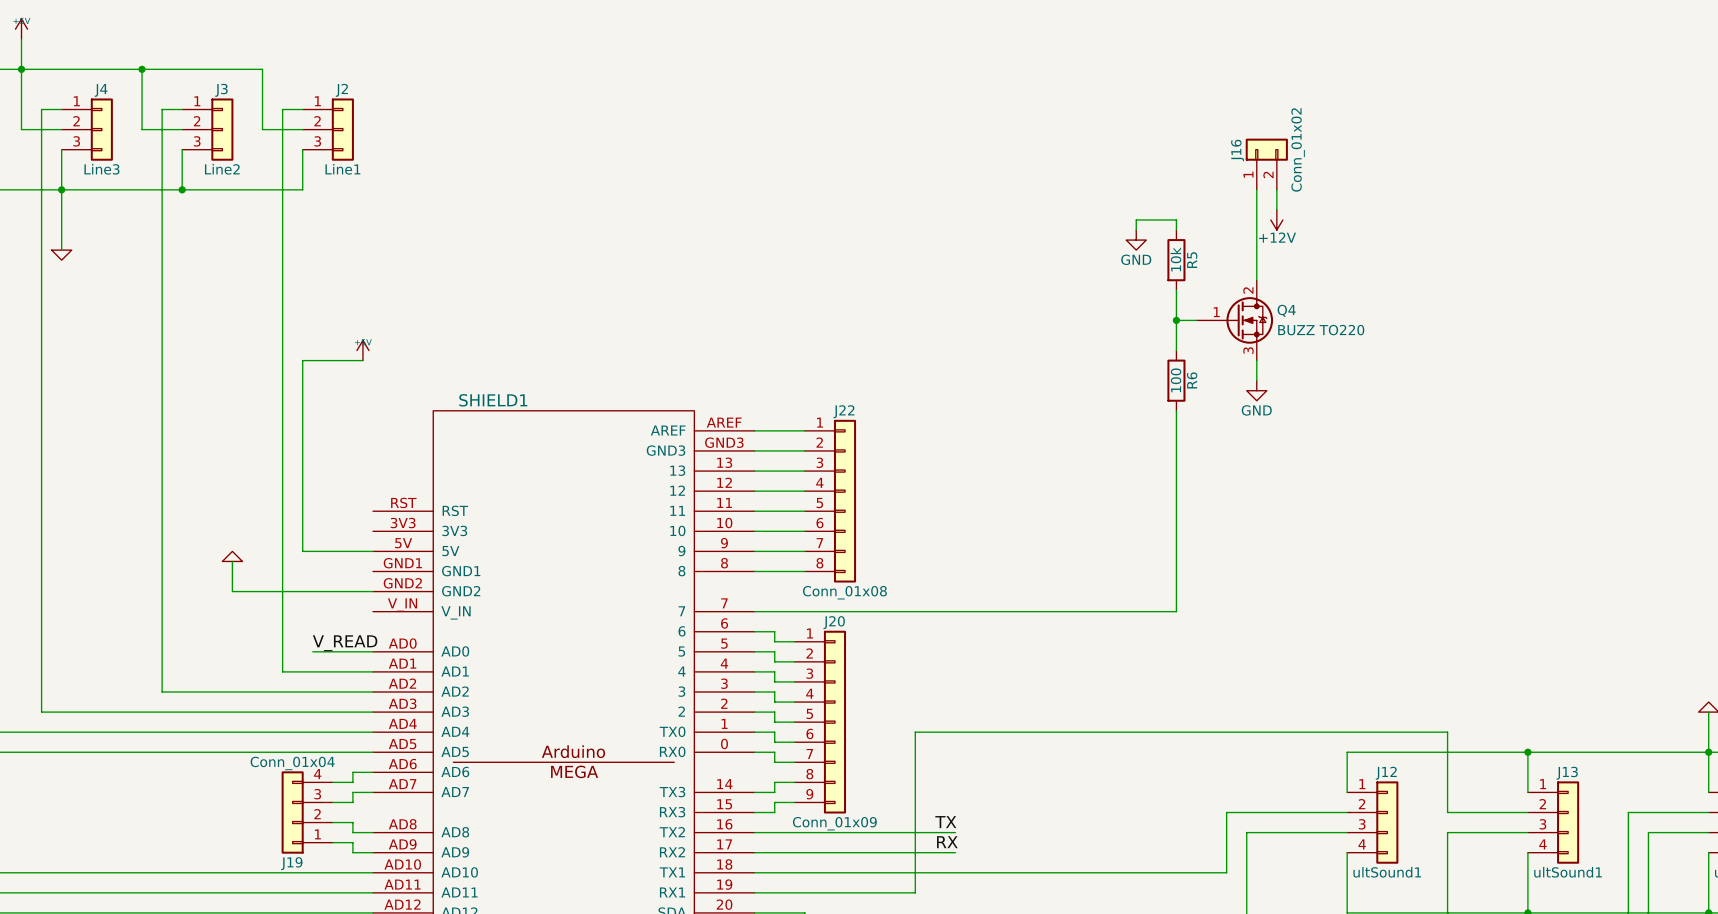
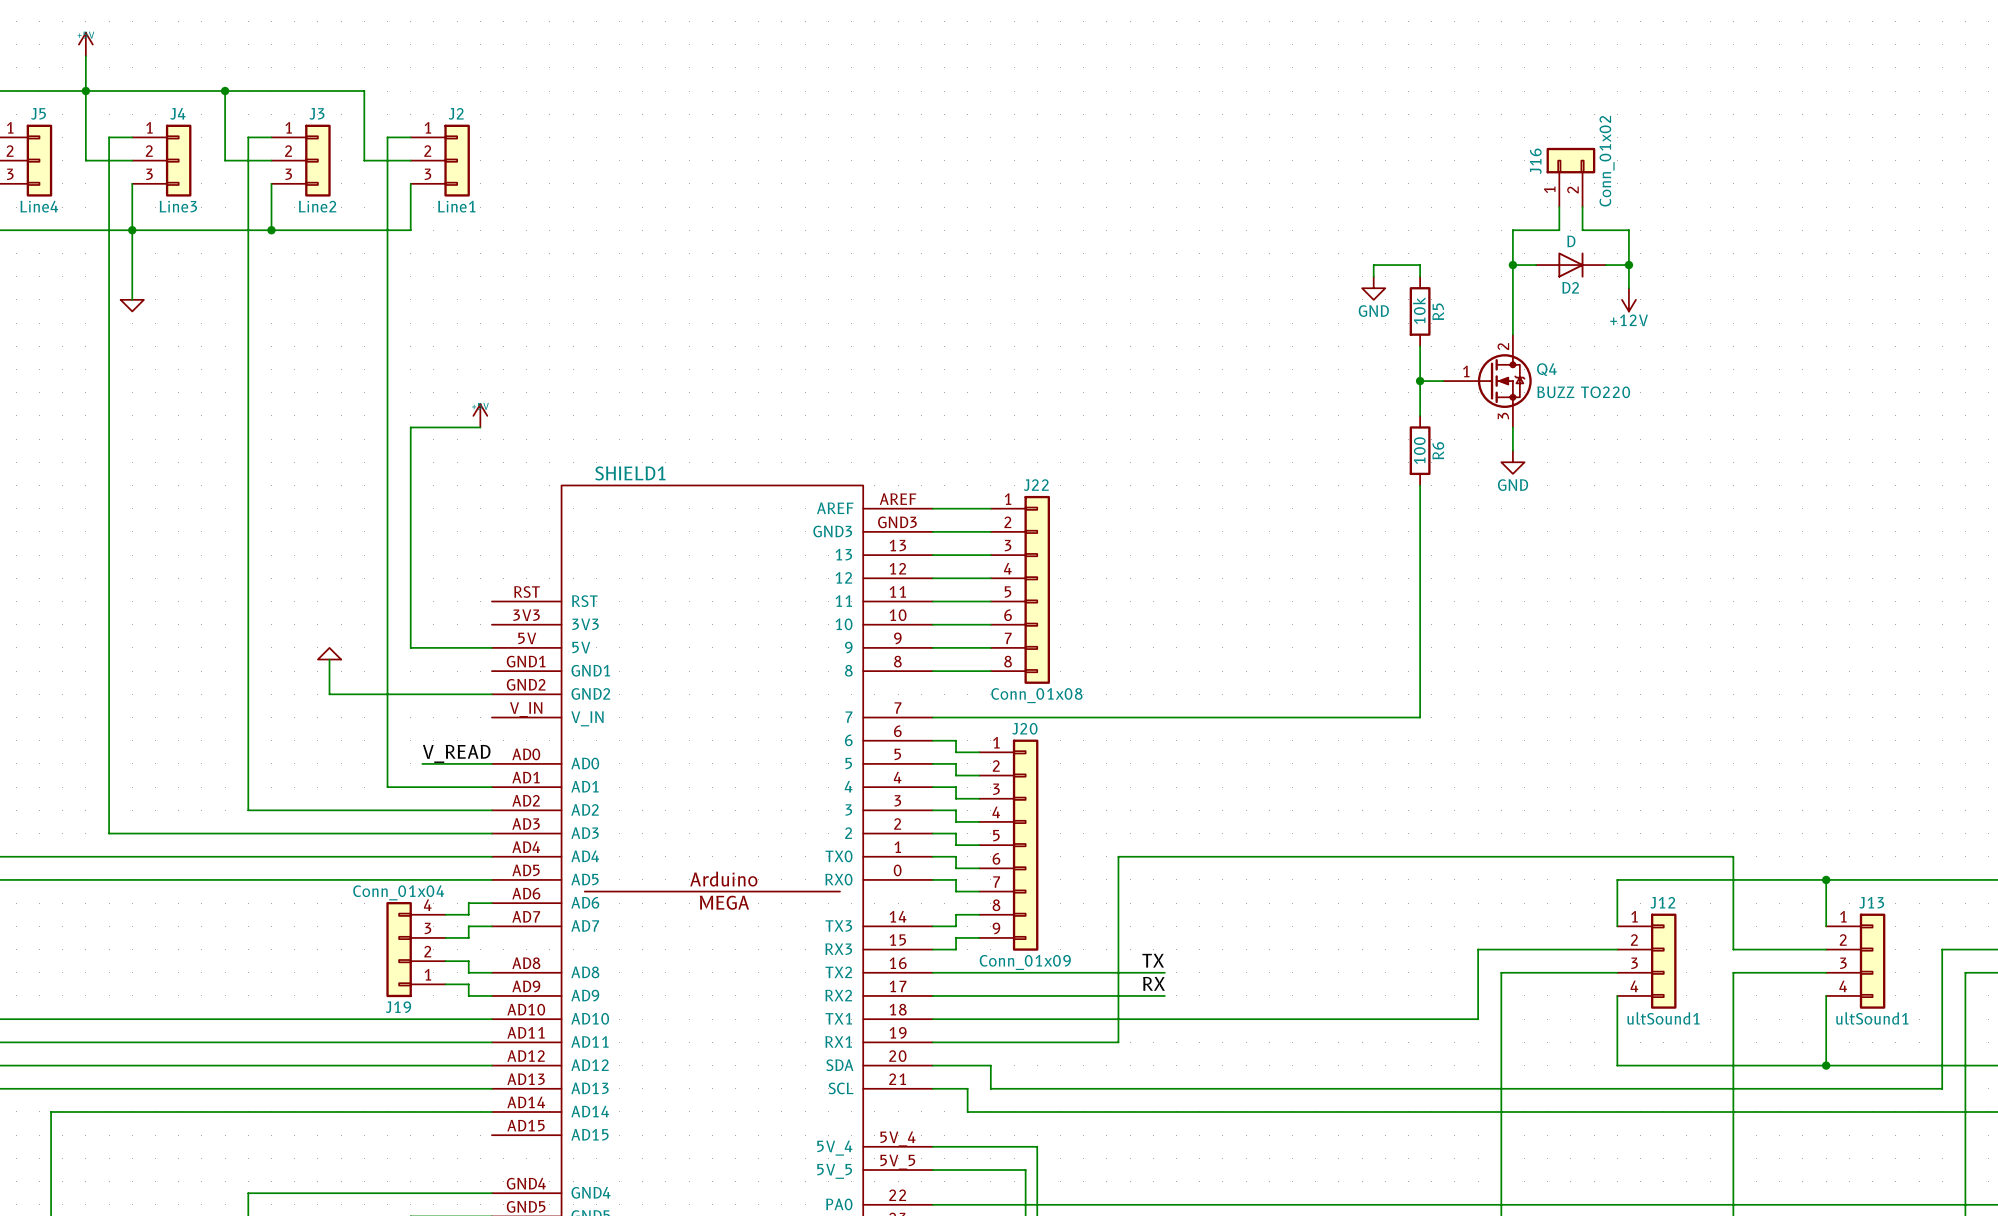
J16 position: (1266, 164) -> (1570, 177)
wire: none -> (1559, 207) (1559, 230) (1512, 230)
wire: none -> (1582, 207) (1582, 230) (1628, 230) (1628, 288)
wire: (1276, 189) (1276, 209) -> none
wire: none -> (1512, 265) (1536, 265)
junction: none -> (1512, 265)
power symbol position: +12V (1276, 219) -> +12V (1628, 299)
D2: none -> D (1570, 265)
wire: none -> (1605, 265) (1628, 265)
junction: none -> (1628, 265)

